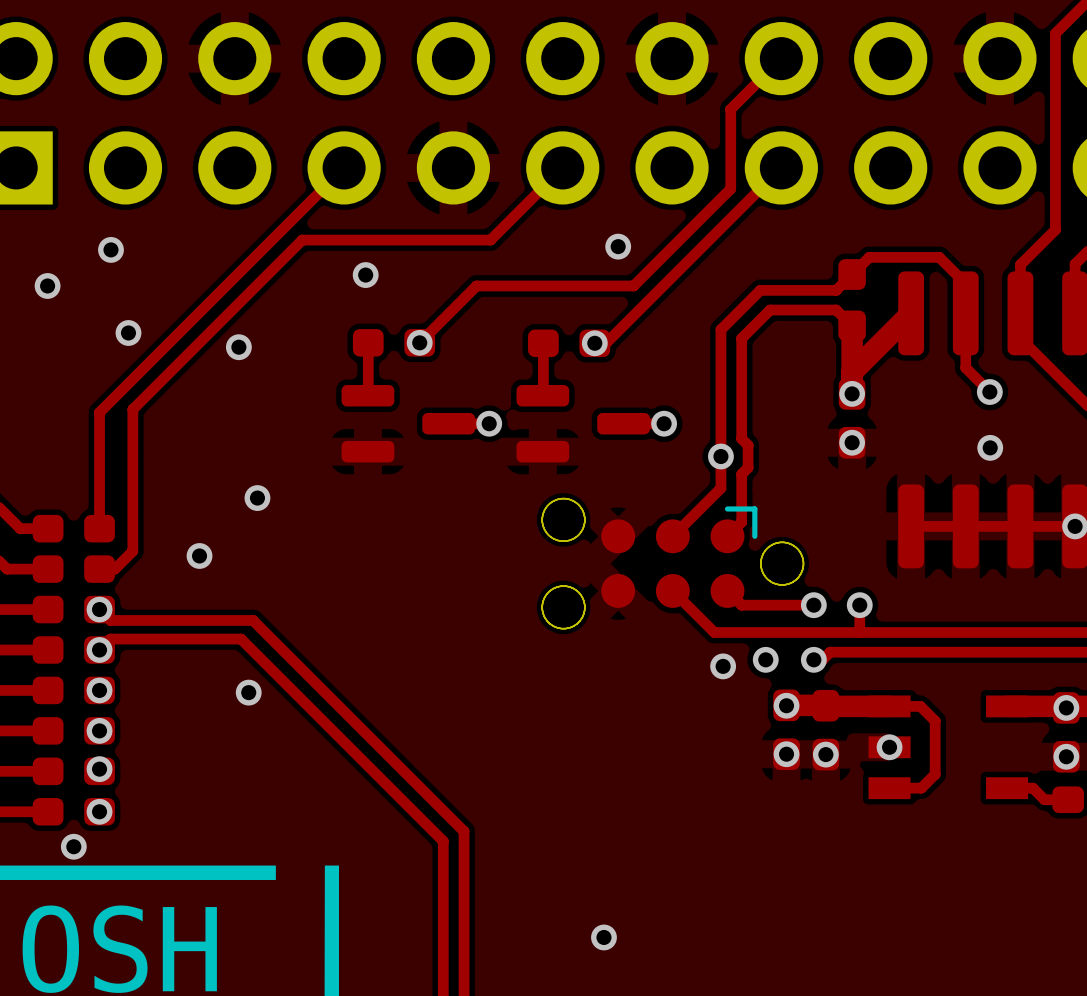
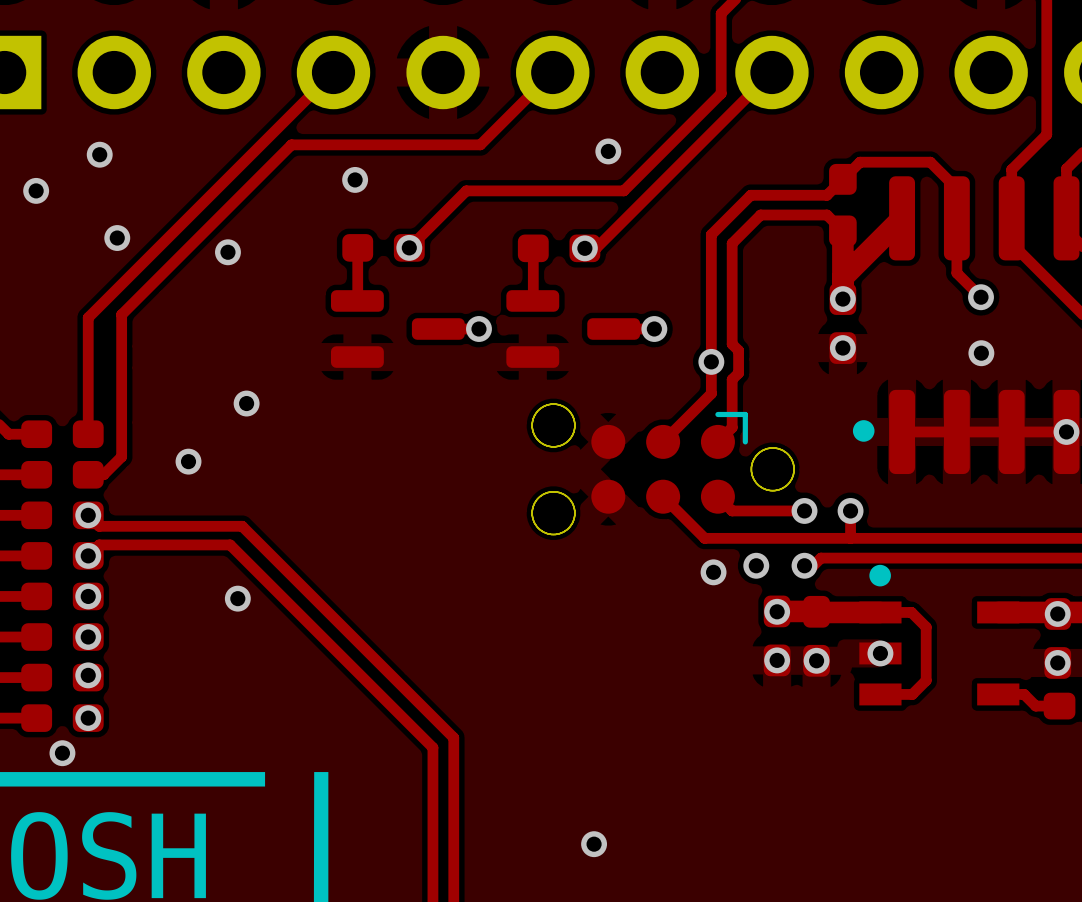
drawing: none -> [852, 420, 875, 442]
drawing: none -> [869, 564, 891, 587]

